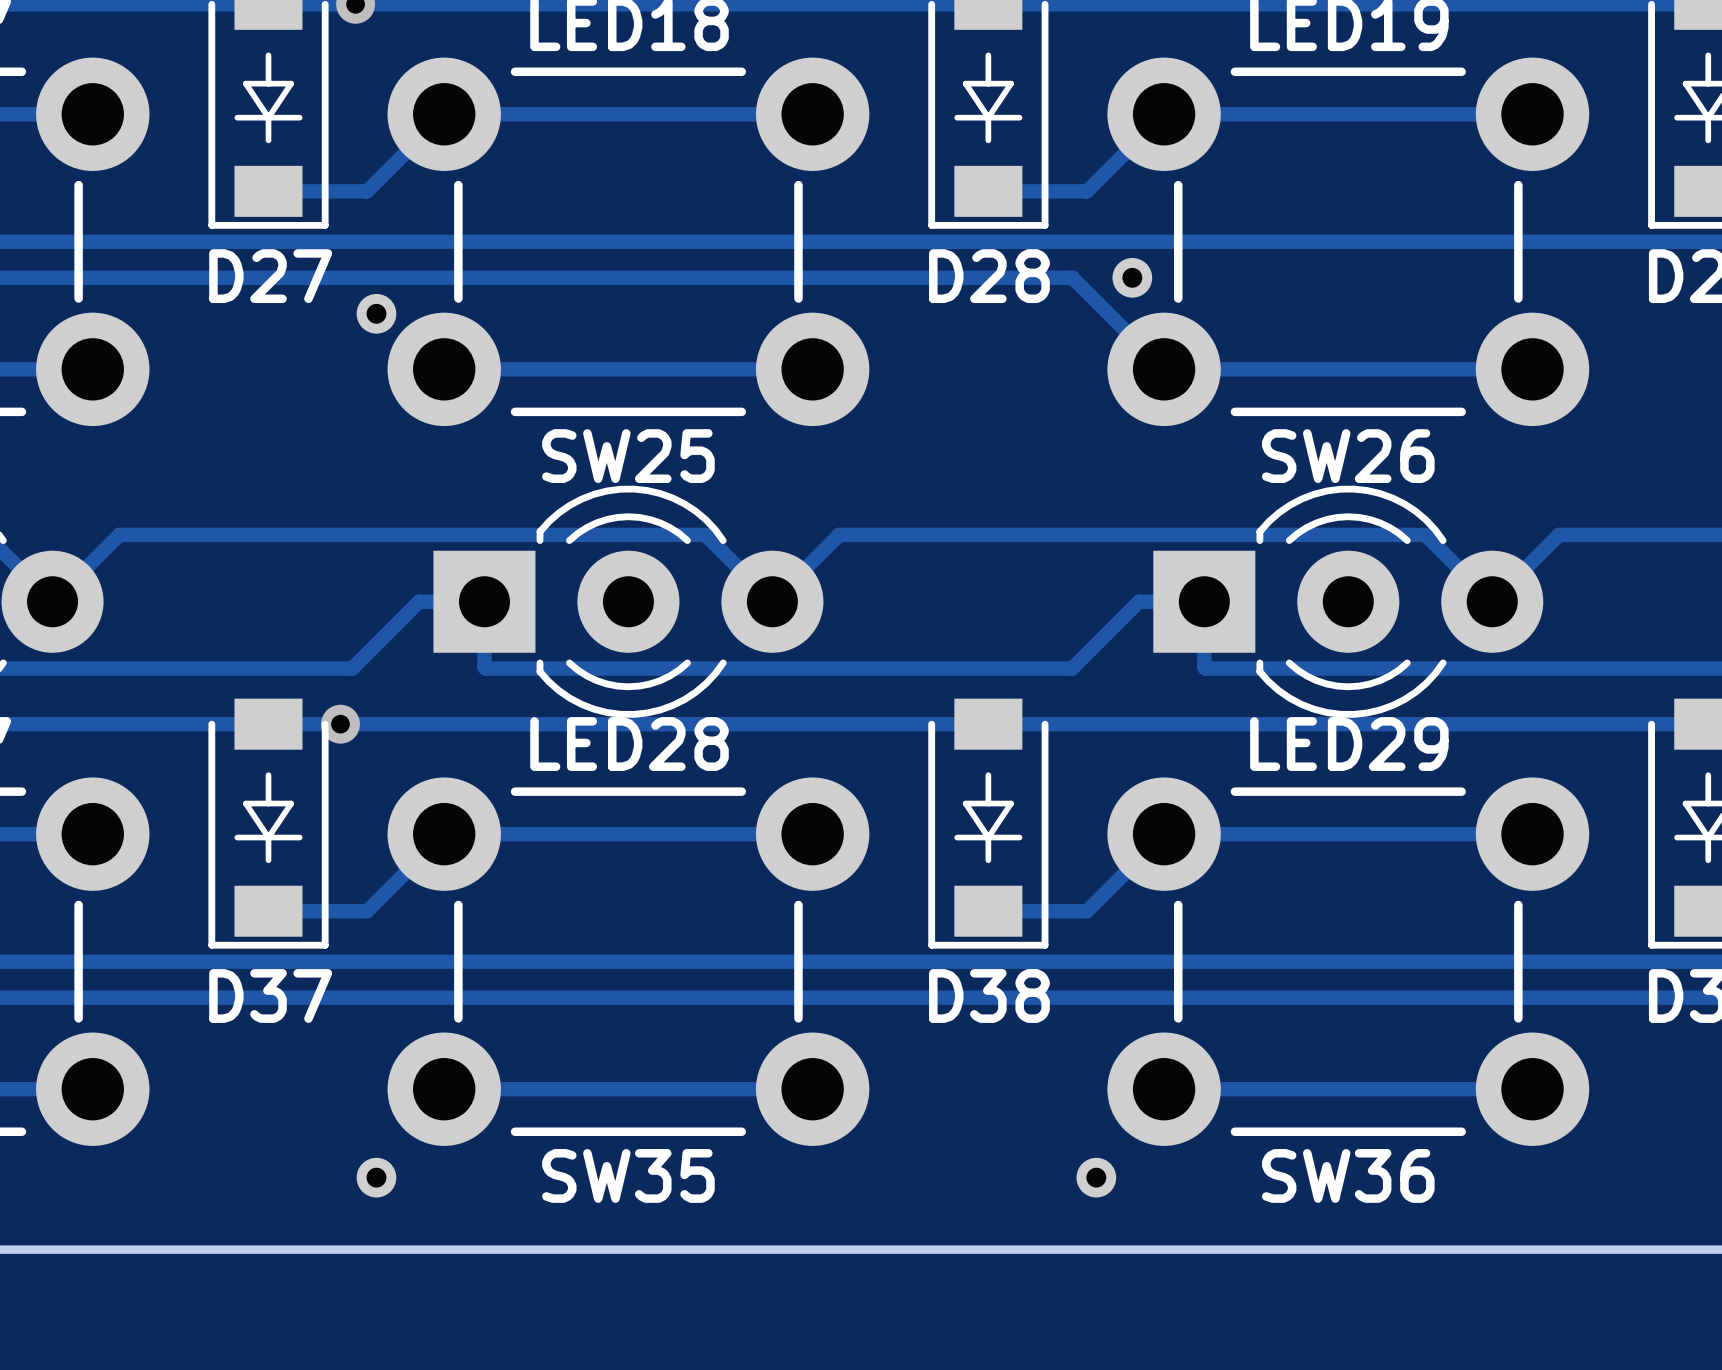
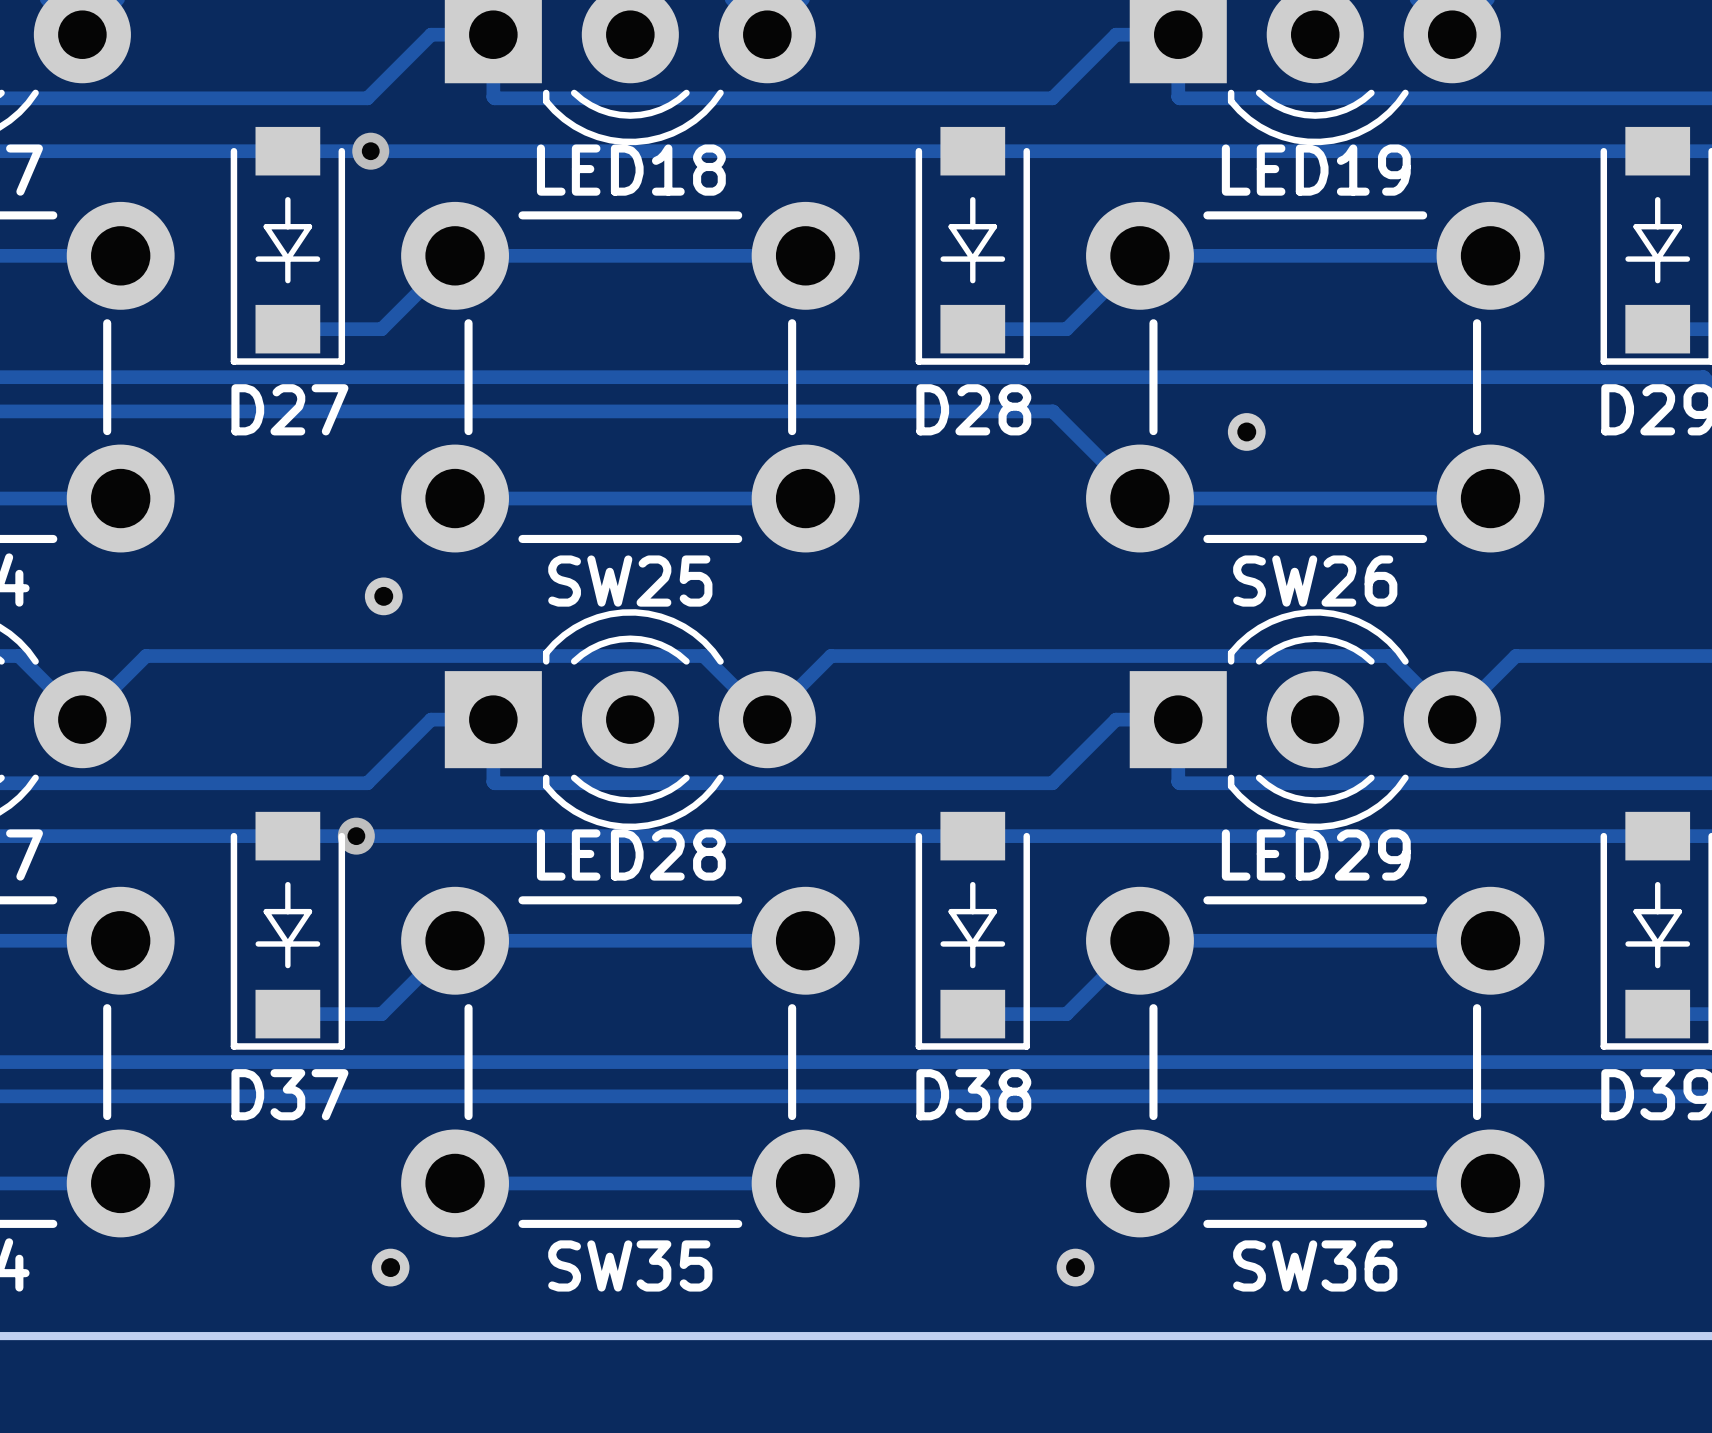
part position: (1132, 277) -> (1246, 431)
part position: (376, 313) -> (383, 596)

